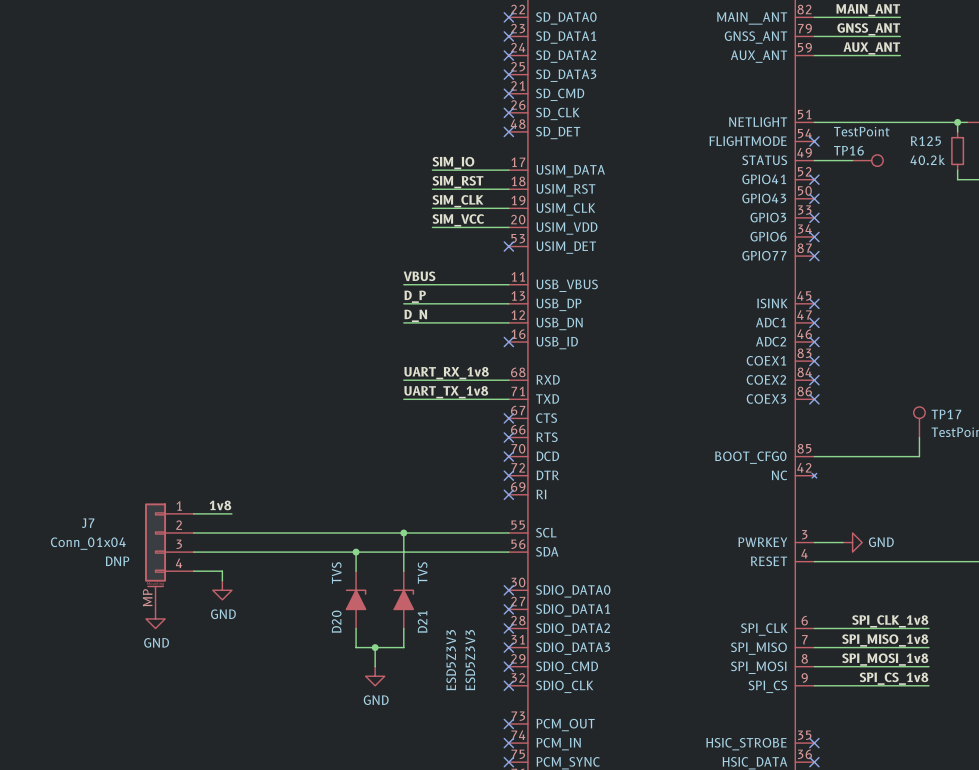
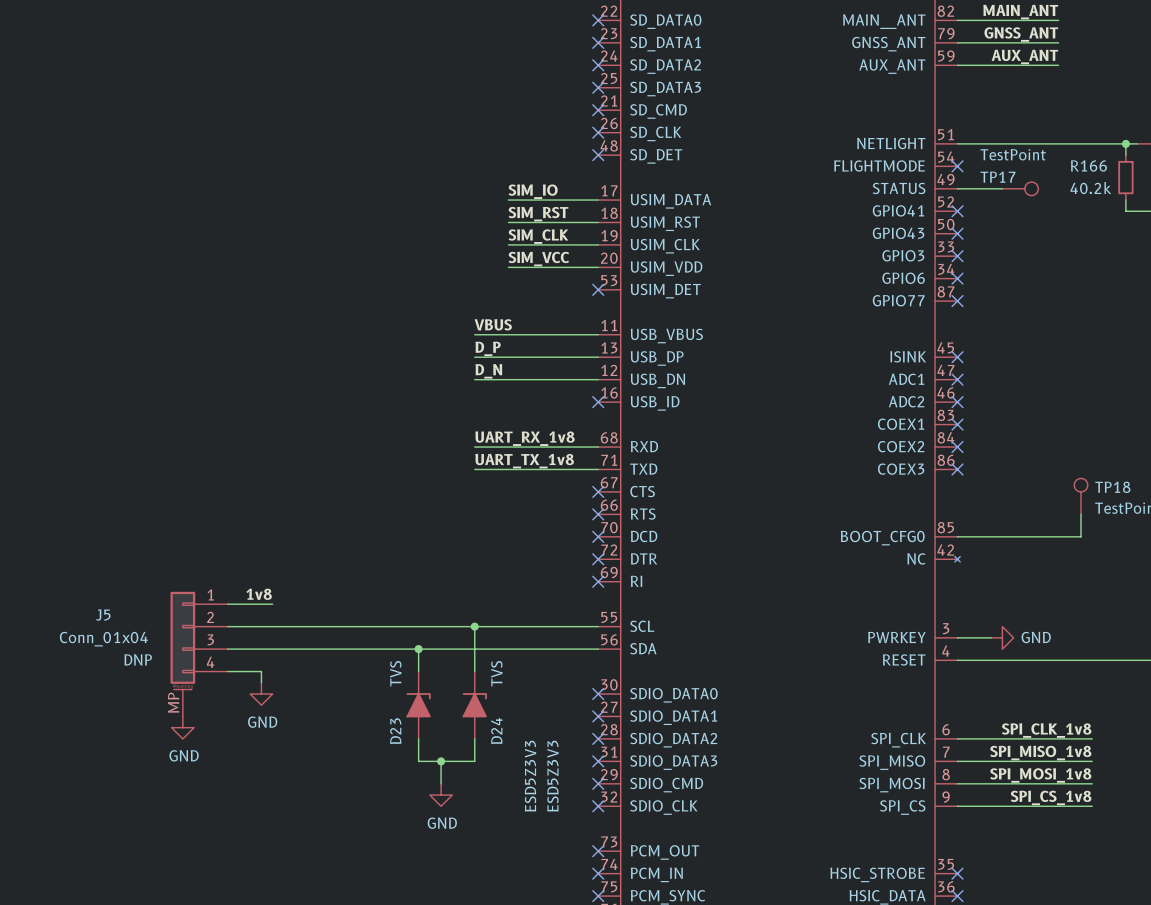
R125 name: R125 (925, 141) -> R166 (1088, 165)
TP16 name: TP16 (848, 150) -> TP17 (997, 177)
TP17 name: TP17 (946, 414) -> TP18 (1112, 487)
J7 name: J7 (88, 523) -> J5 (103, 615)
D20 name: D20 (336, 621) -> D23 (395, 731)
D21 name: D21 (422, 621) -> D24 (496, 730)

